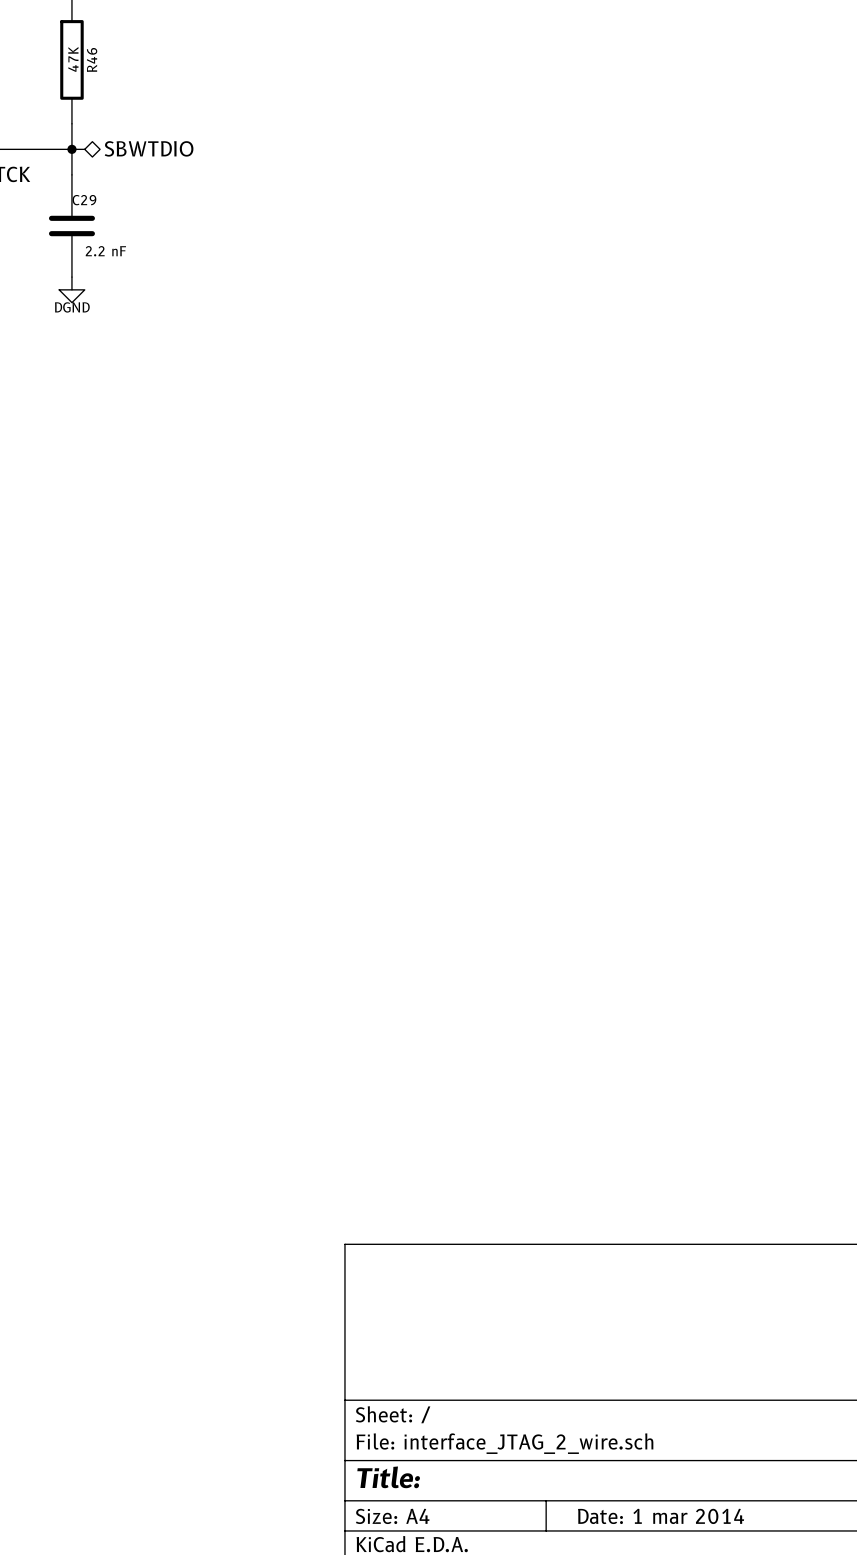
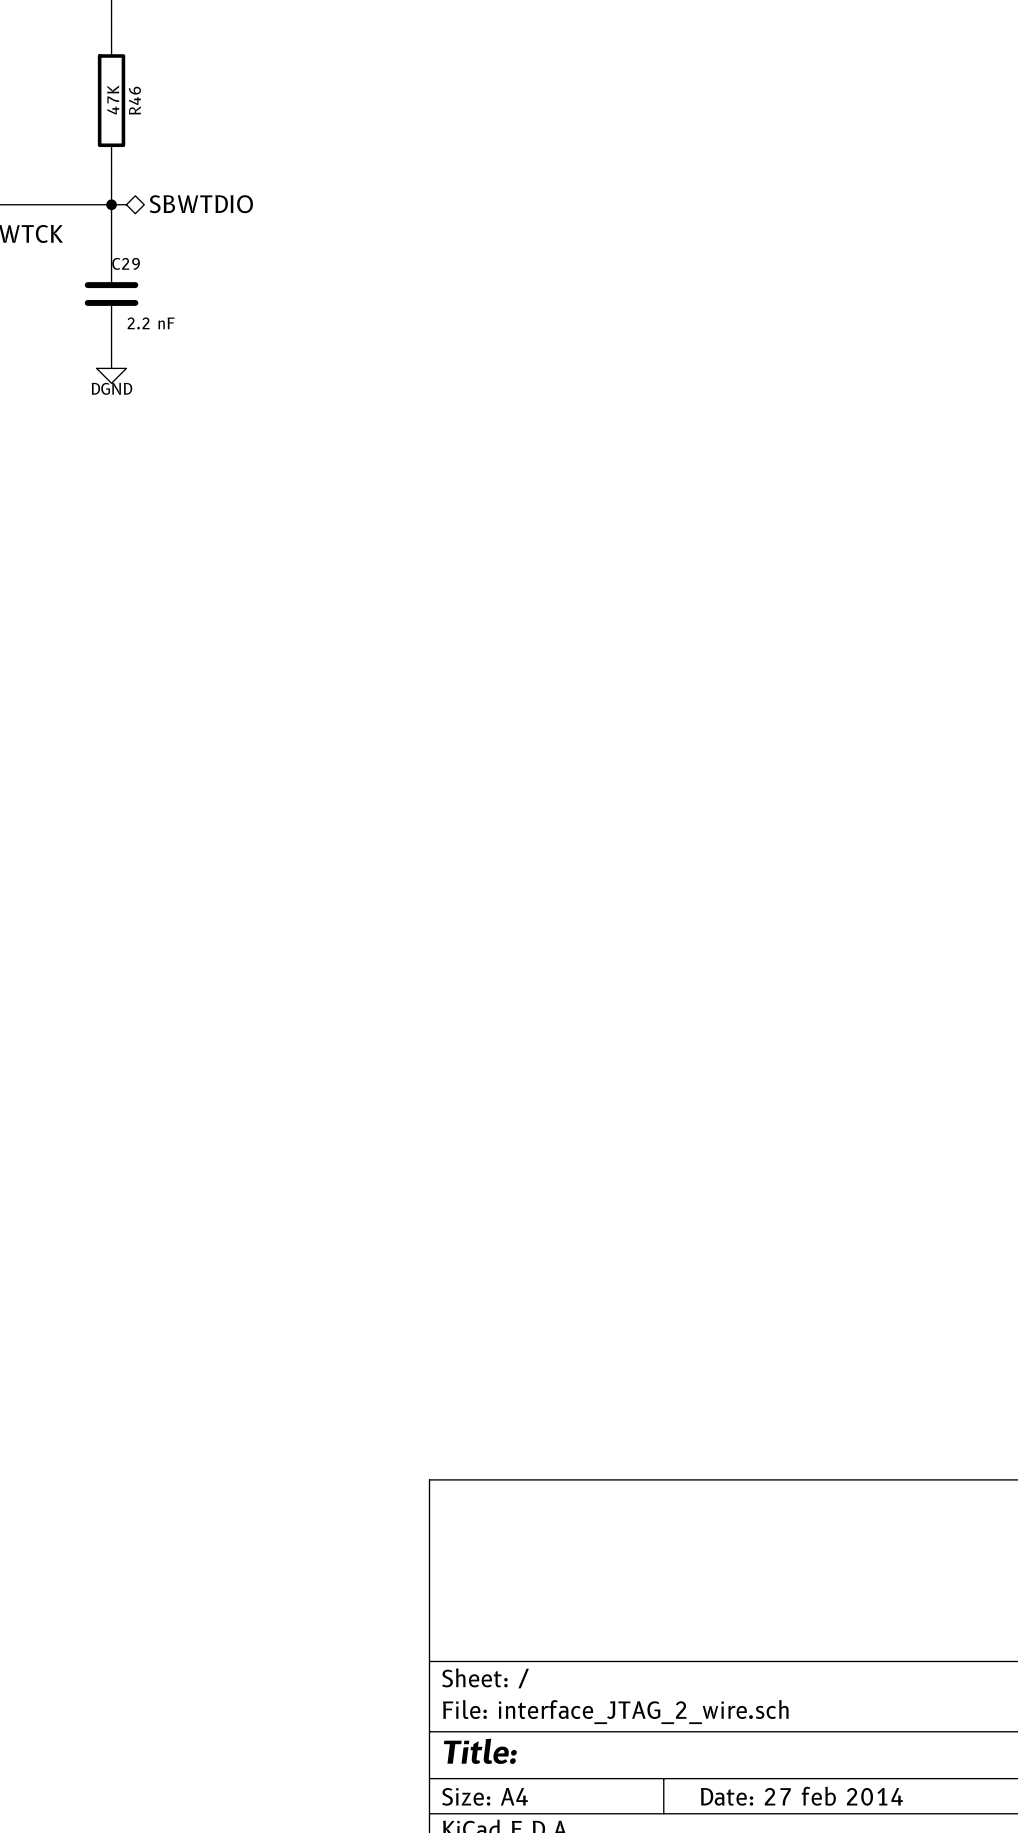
title block: Date: 1 mar 2014 (661, 1516) -> Date: 27 feb 2014 (801, 1796)

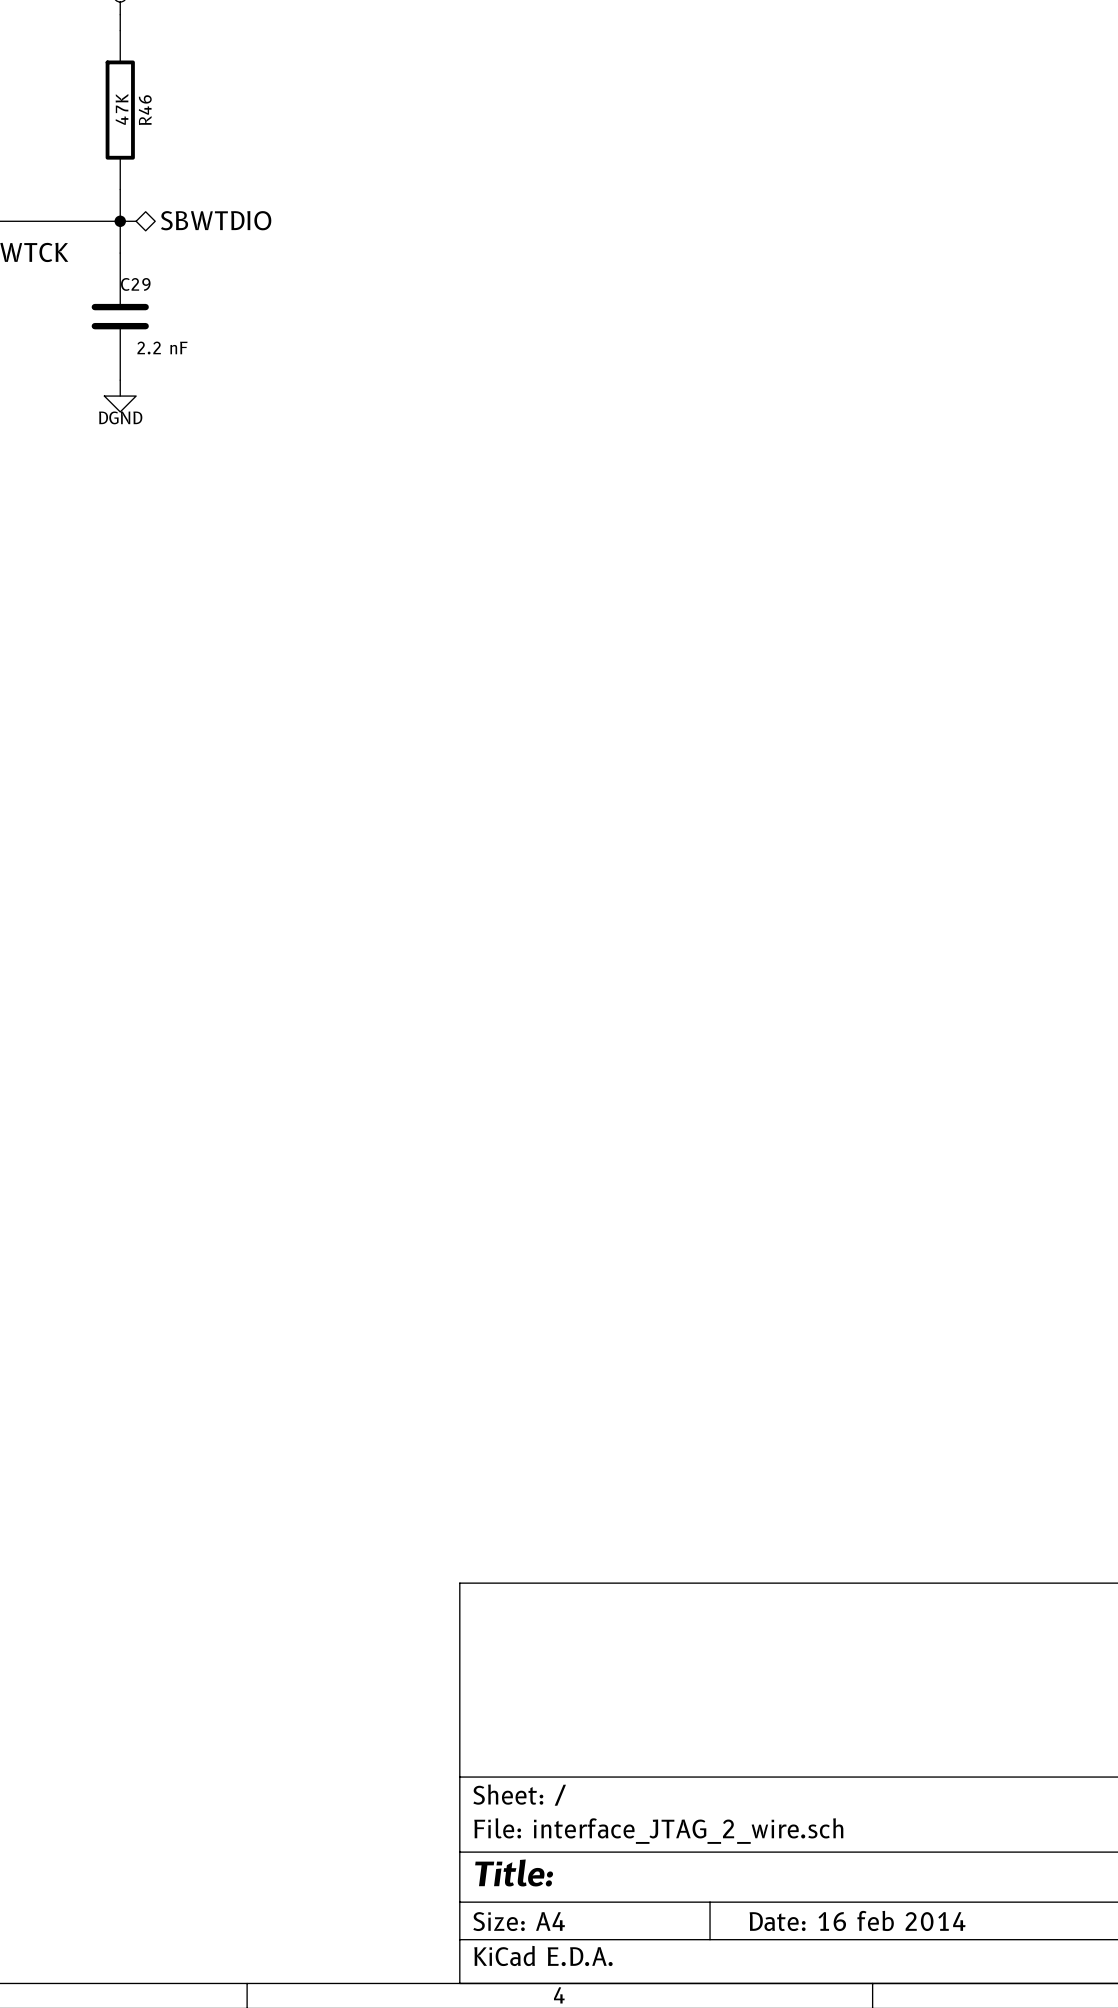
title block: Date: 27 feb 2014 (801, 1796) -> Date: 16 feb 2014 (857, 1920)

